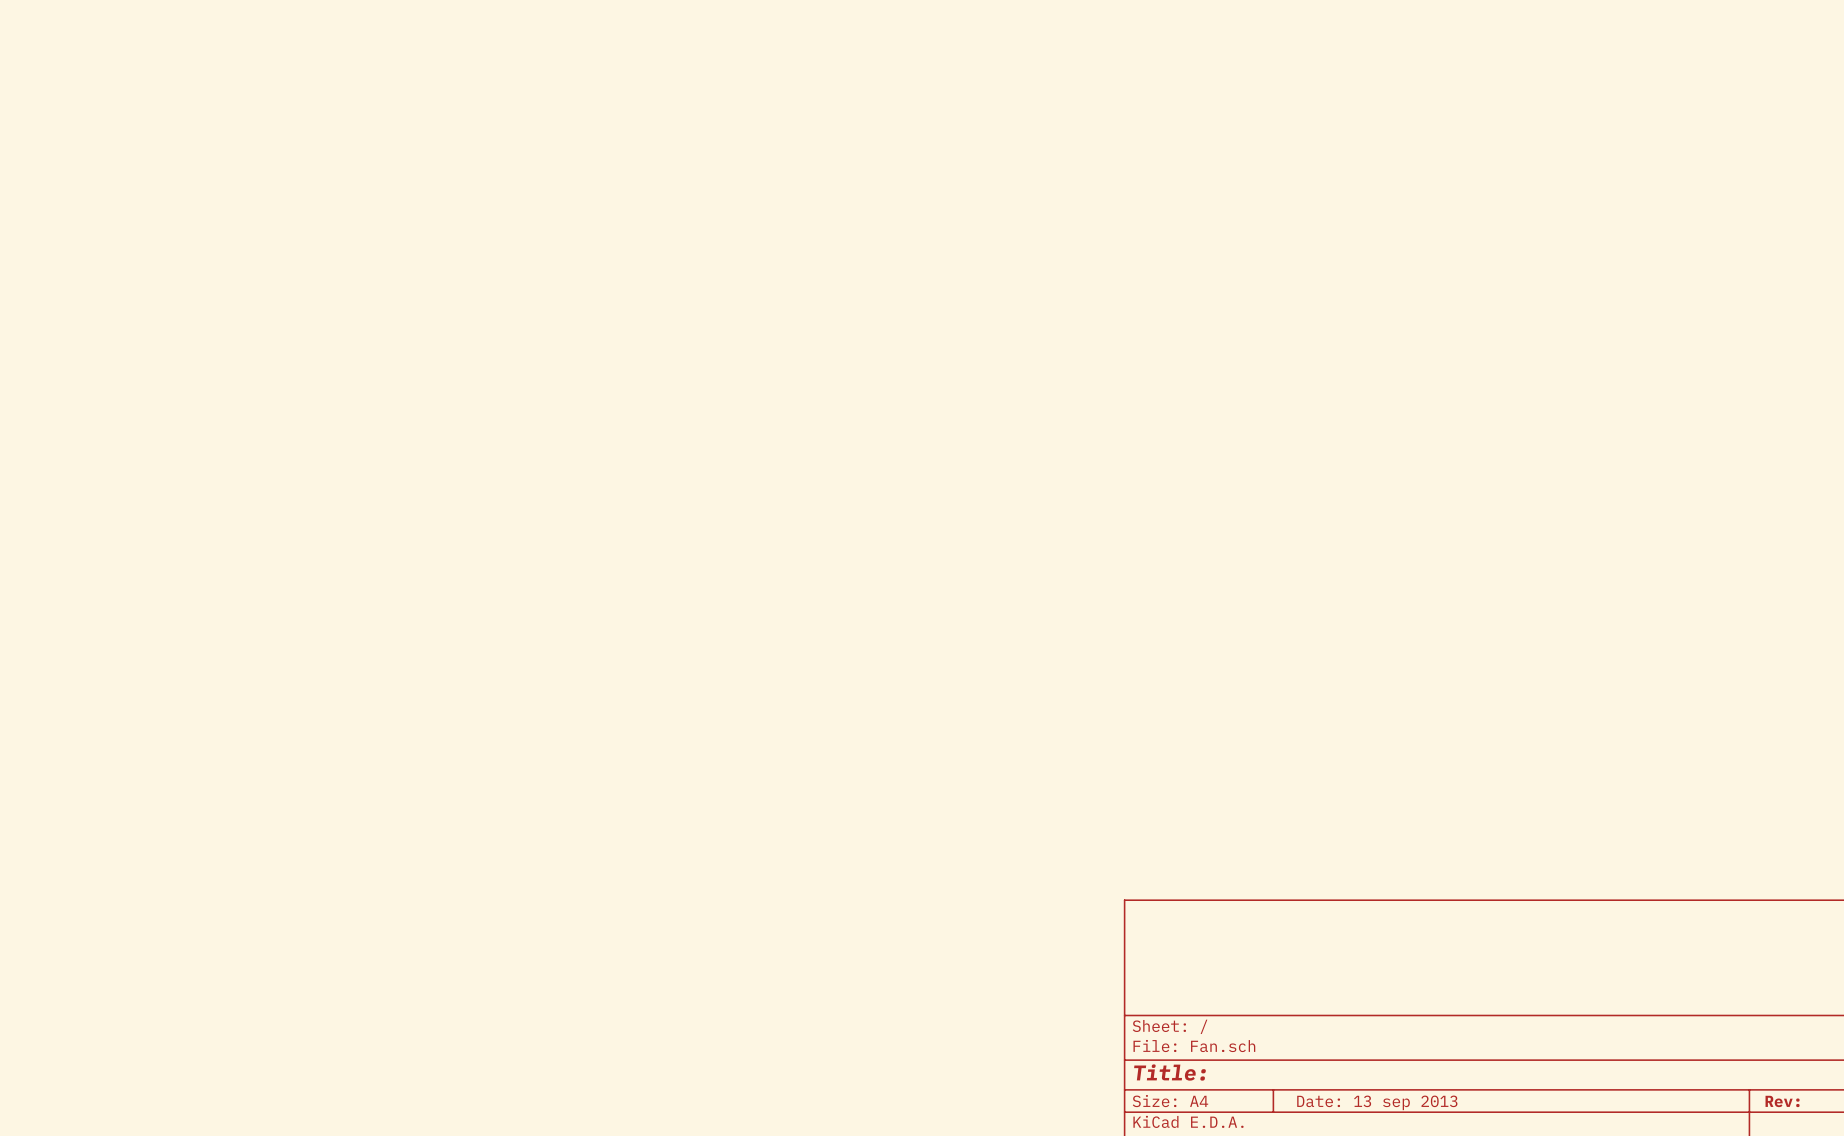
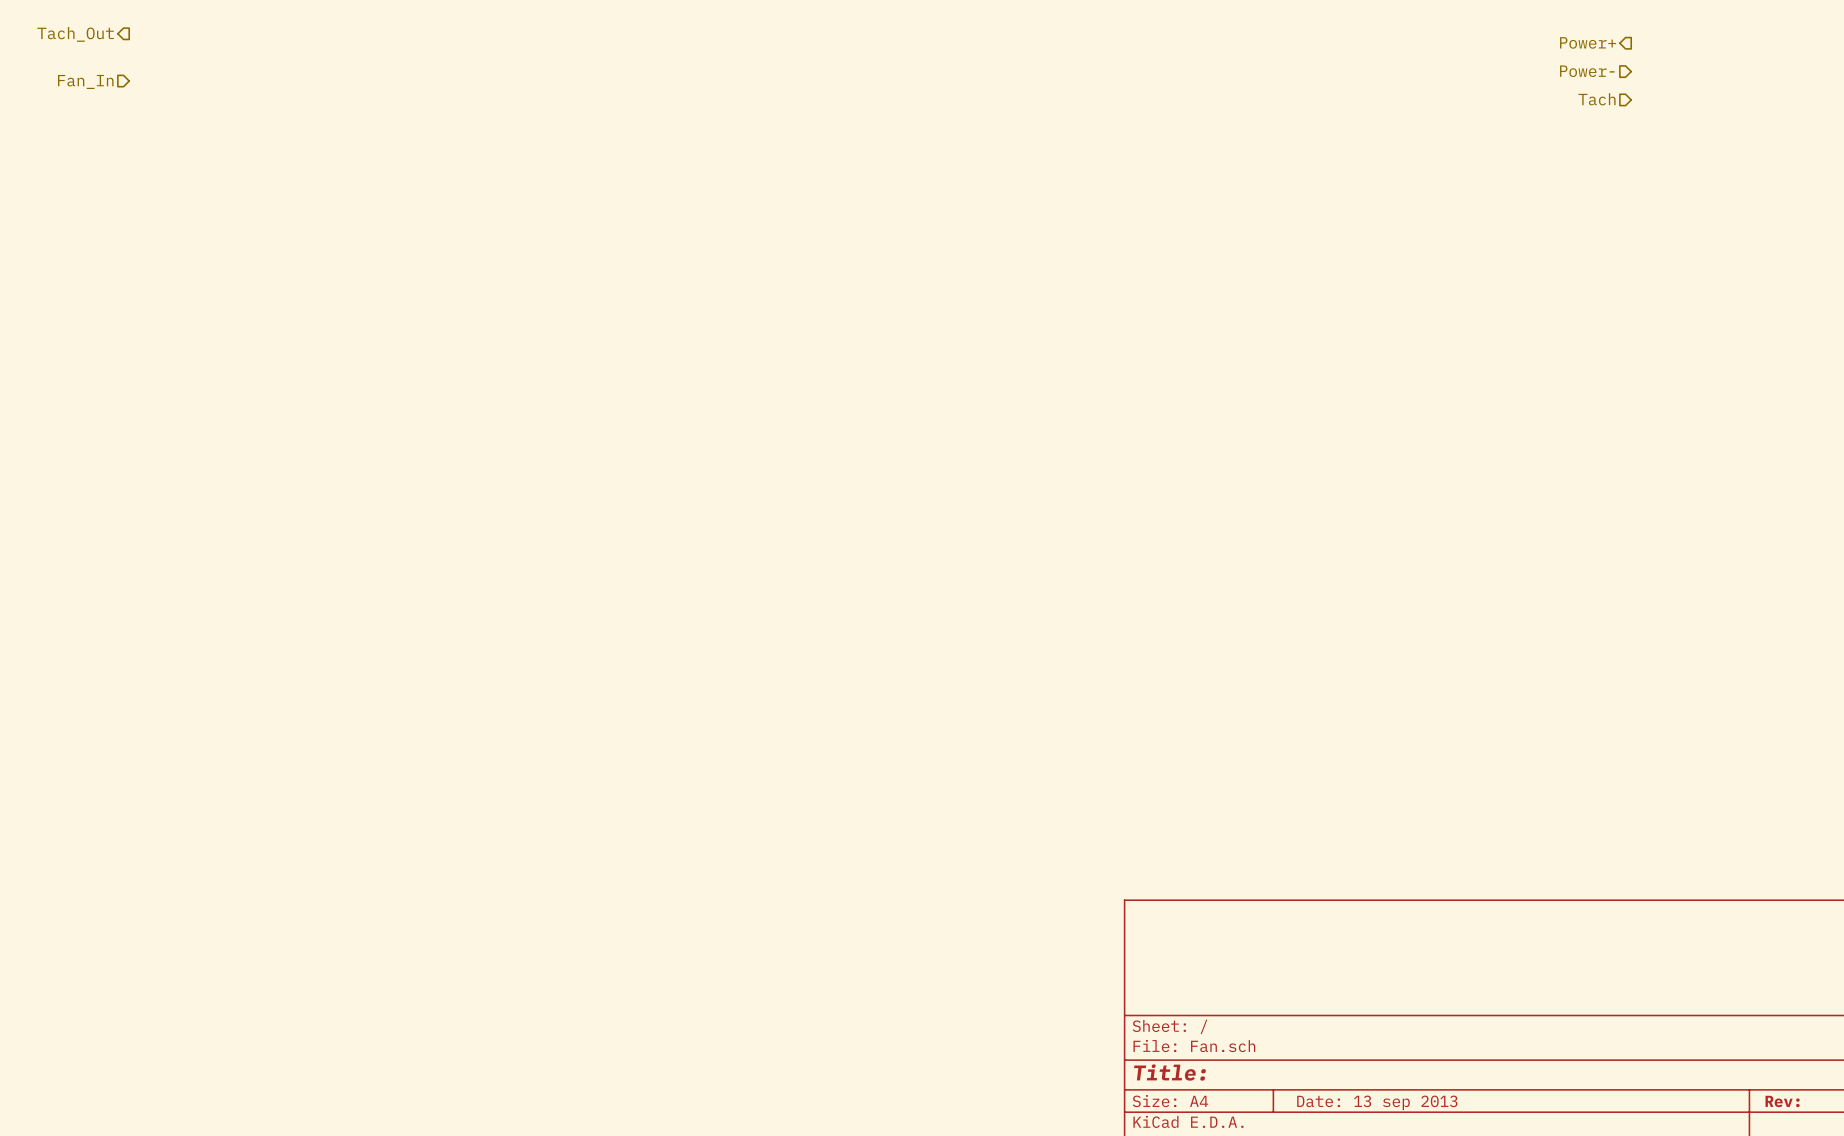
hierarchical label: none -> Tach_Out (75, 34)
hierarchical label: none -> Power+ (1588, 42)
hierarchical label: none -> Power- (1587, 71)
hierarchical label: none -> Fan_In (85, 81)
hierarchical label: none -> Tach (1597, 99)

